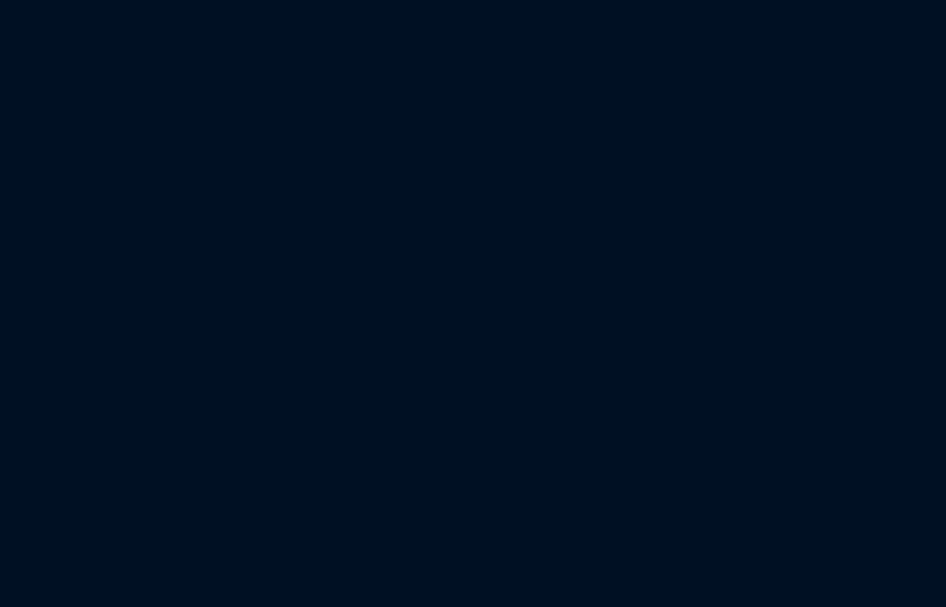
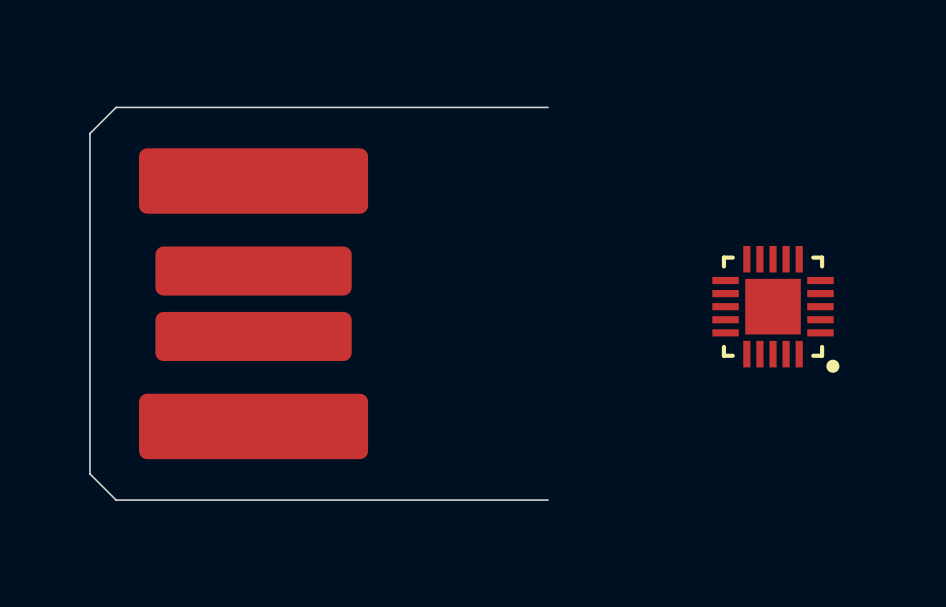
part: none -> (319, 303)
part: none -> (775, 309)

